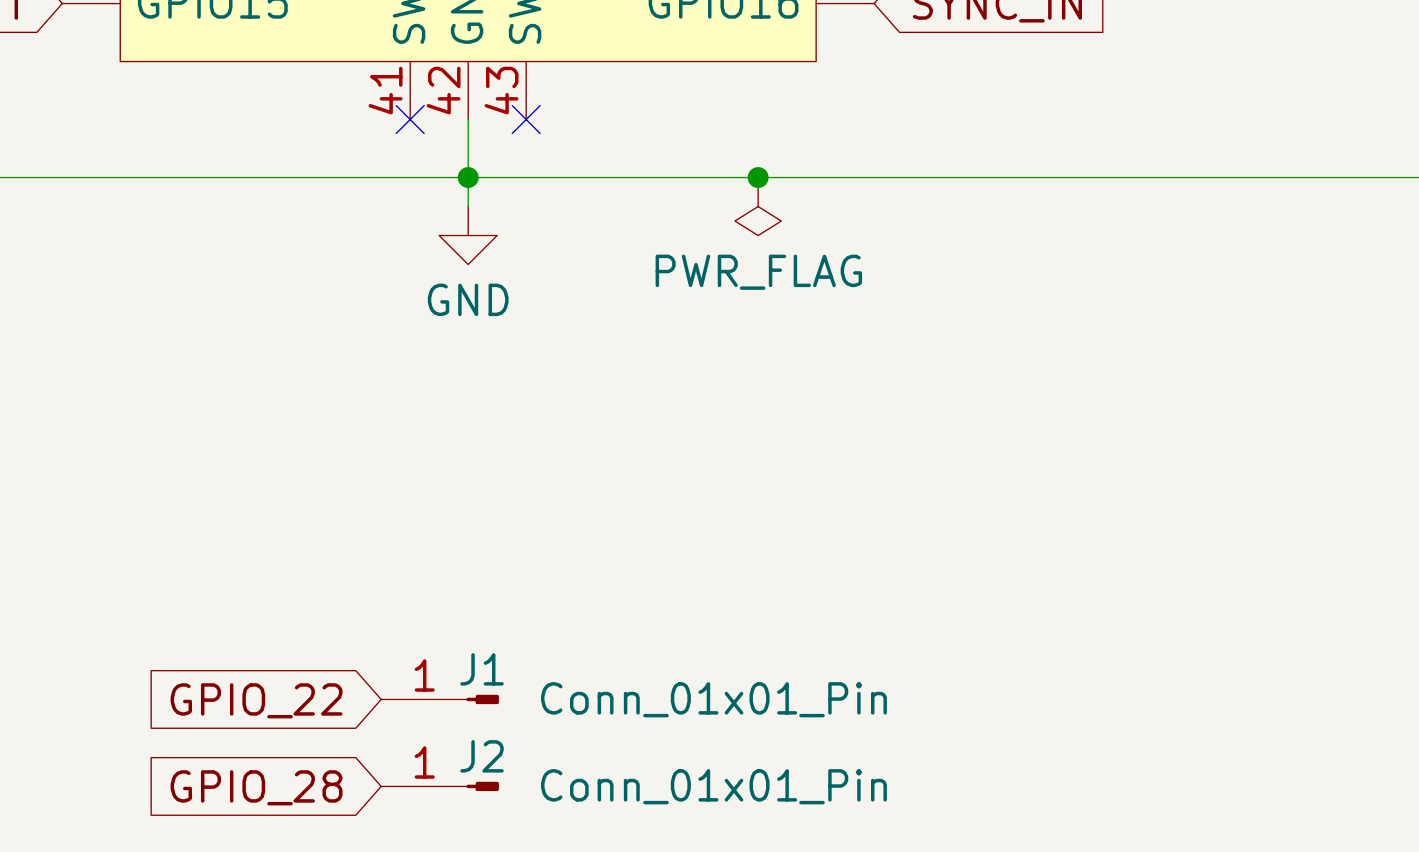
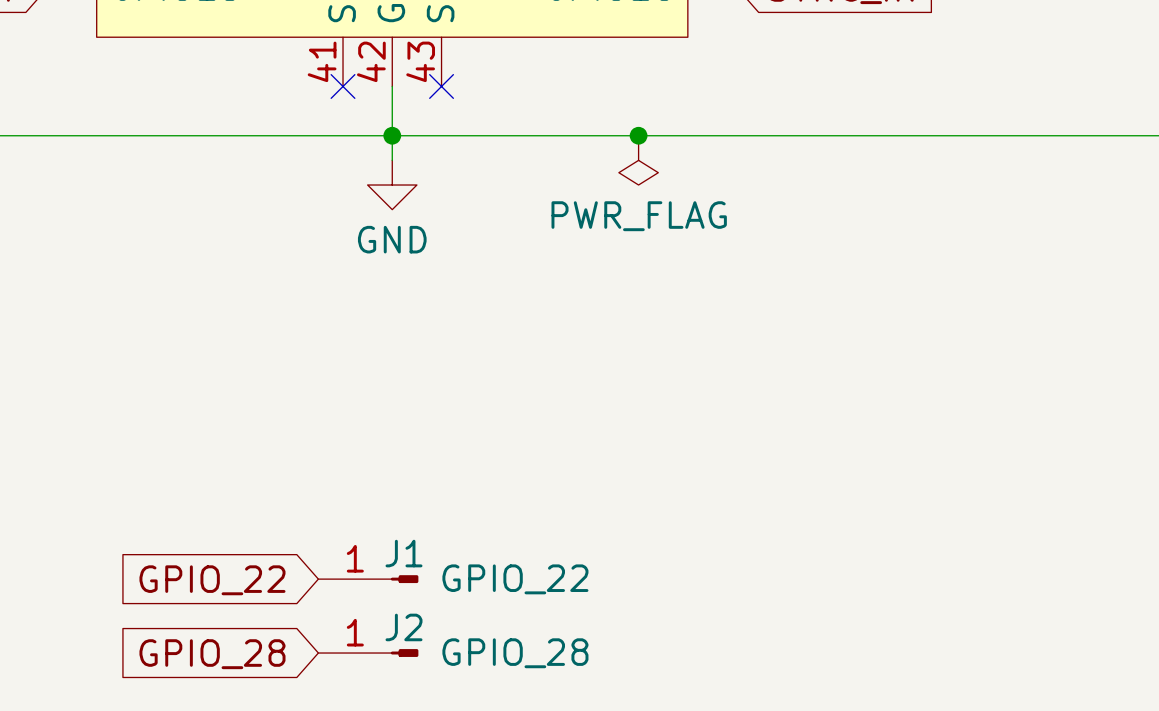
J1 value: Conn_01x01_Pin (713, 699) -> GPIO_22 (515, 579)
J2 value: Conn_01x01_Pin (713, 786) -> GPIO_28 (515, 653)

